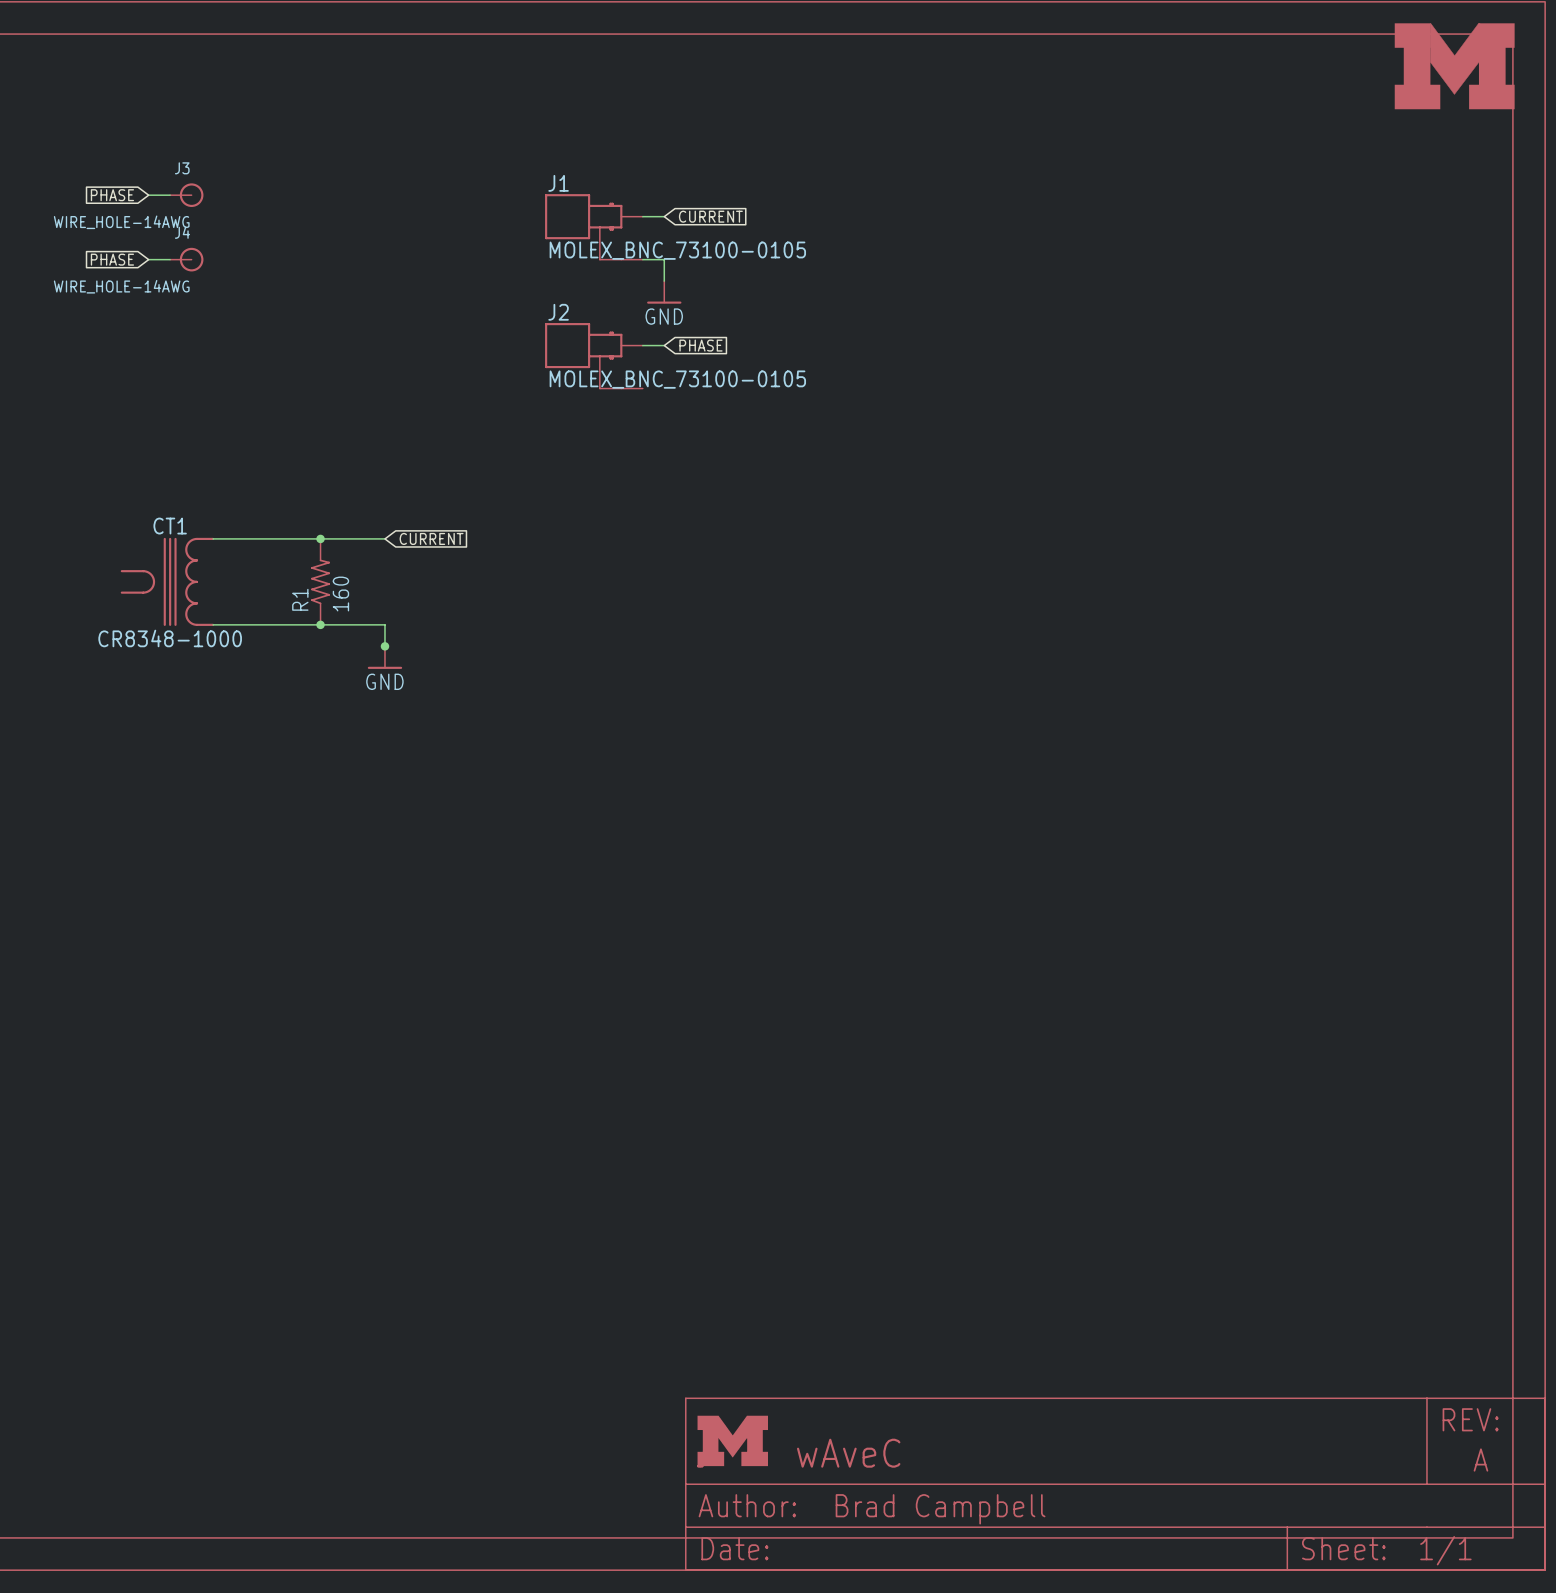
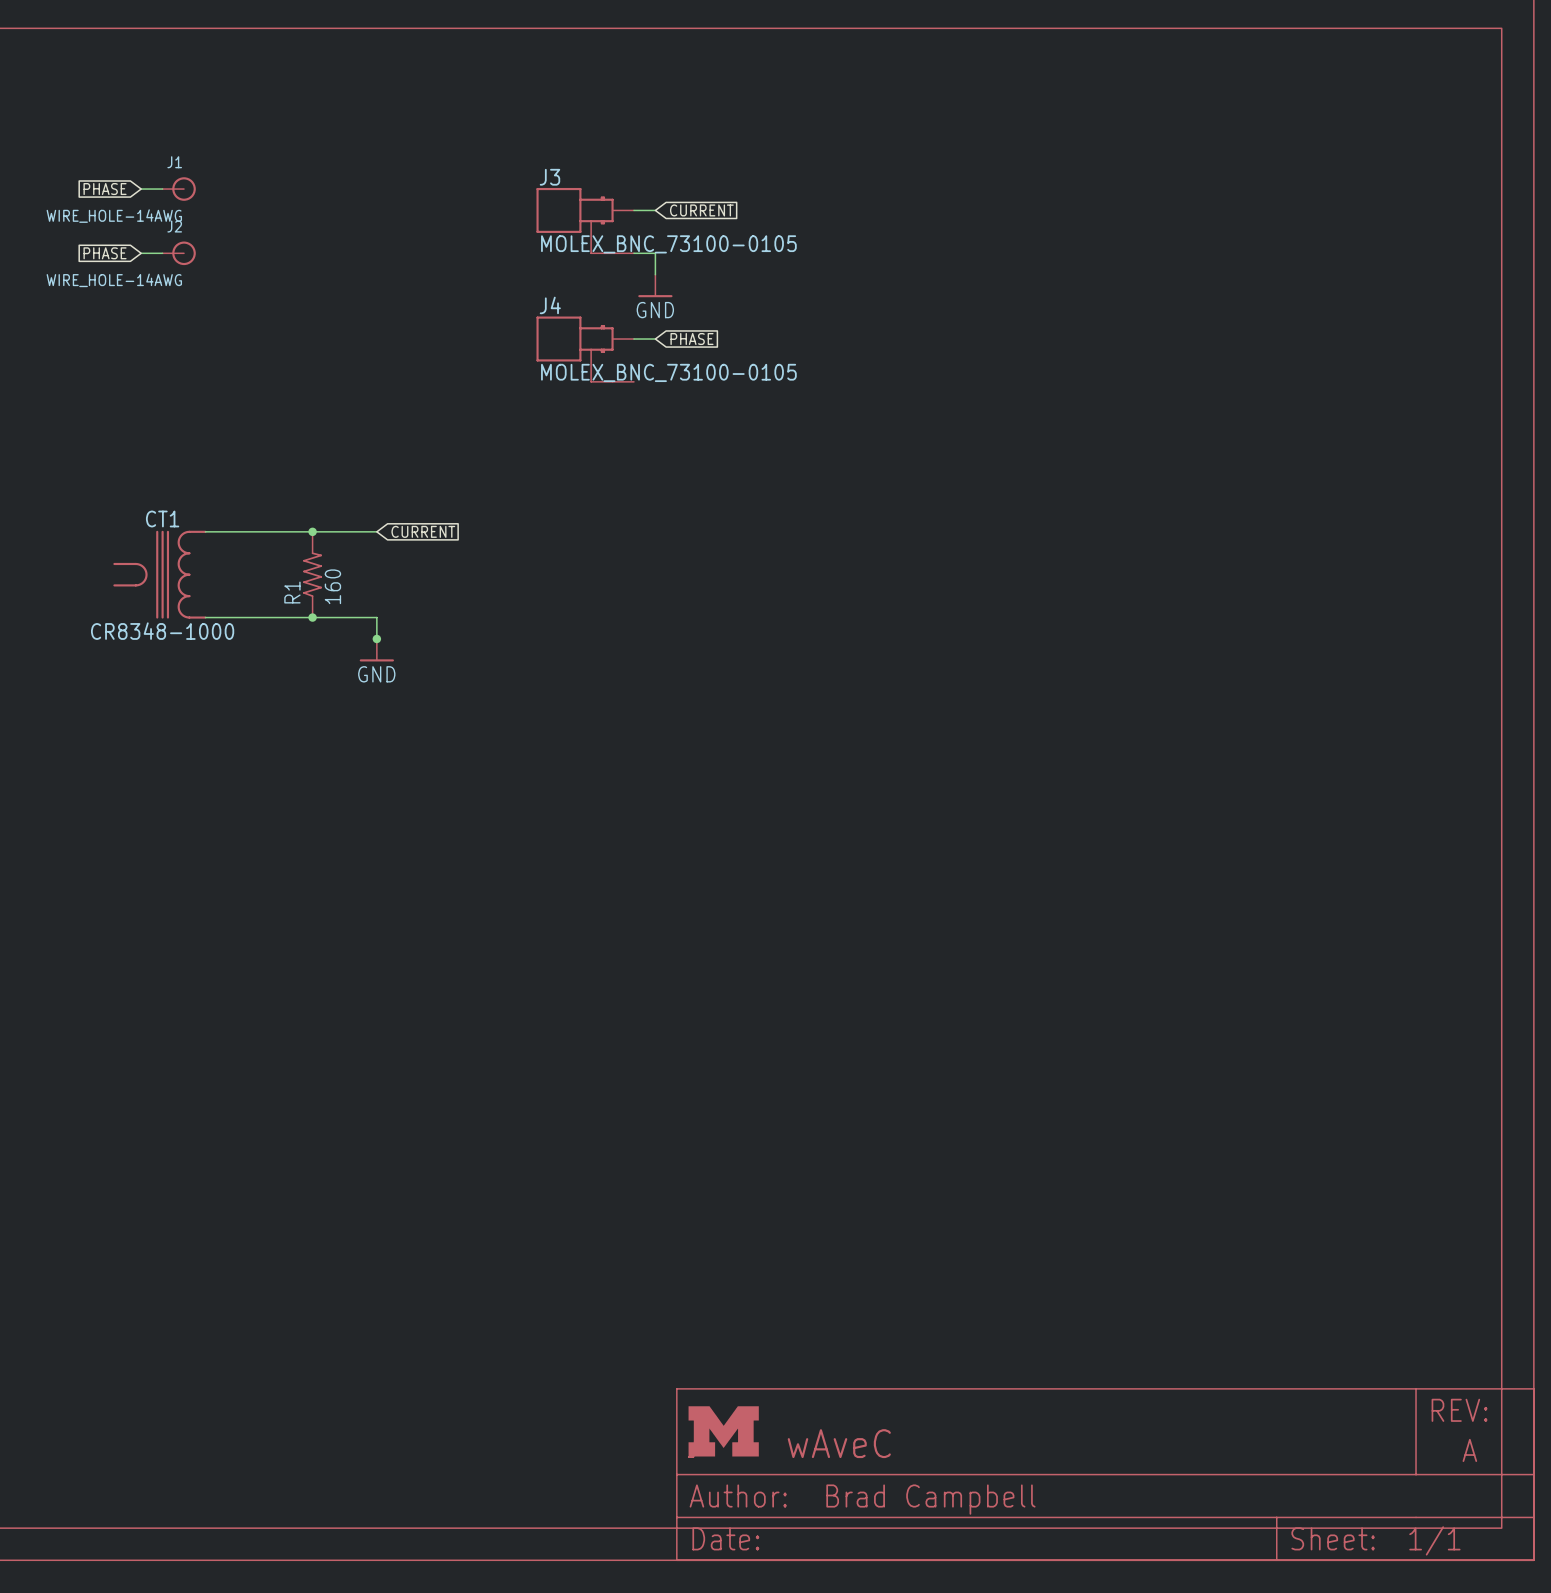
part: (1454, 66) -> none
J3 name: J3 (182, 168) -> J1 (174, 162)
J1 name: J1 (558, 183) -> J3 (549, 177)
J4 name: J4 (182, 232) -> J2 (174, 226)
J2 name: J2 (558, 312) -> J4 (550, 305)

